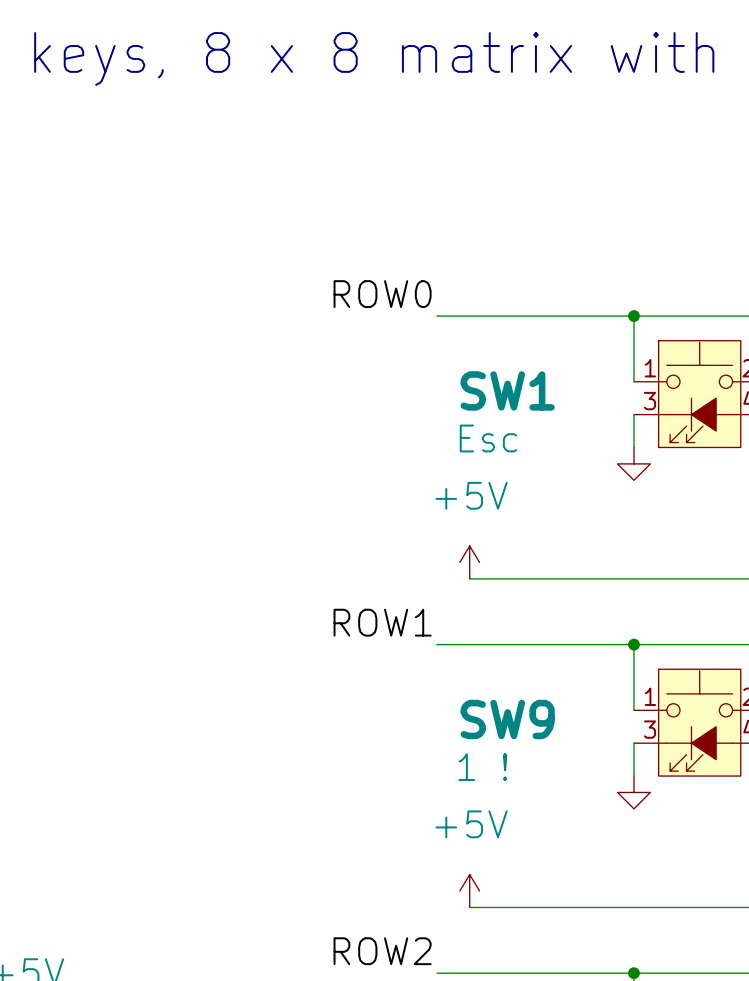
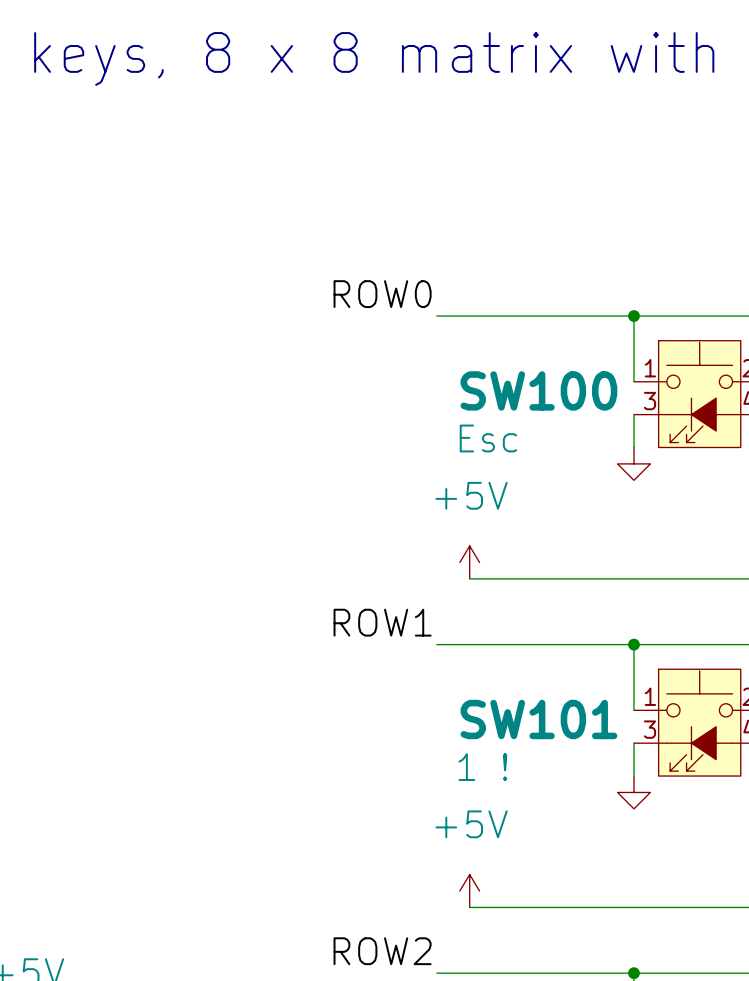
SW1 name: SW1 (507, 390) -> SW100 (538, 390)
SW9 name: SW9 (507, 719) -> SW101 (538, 719)

